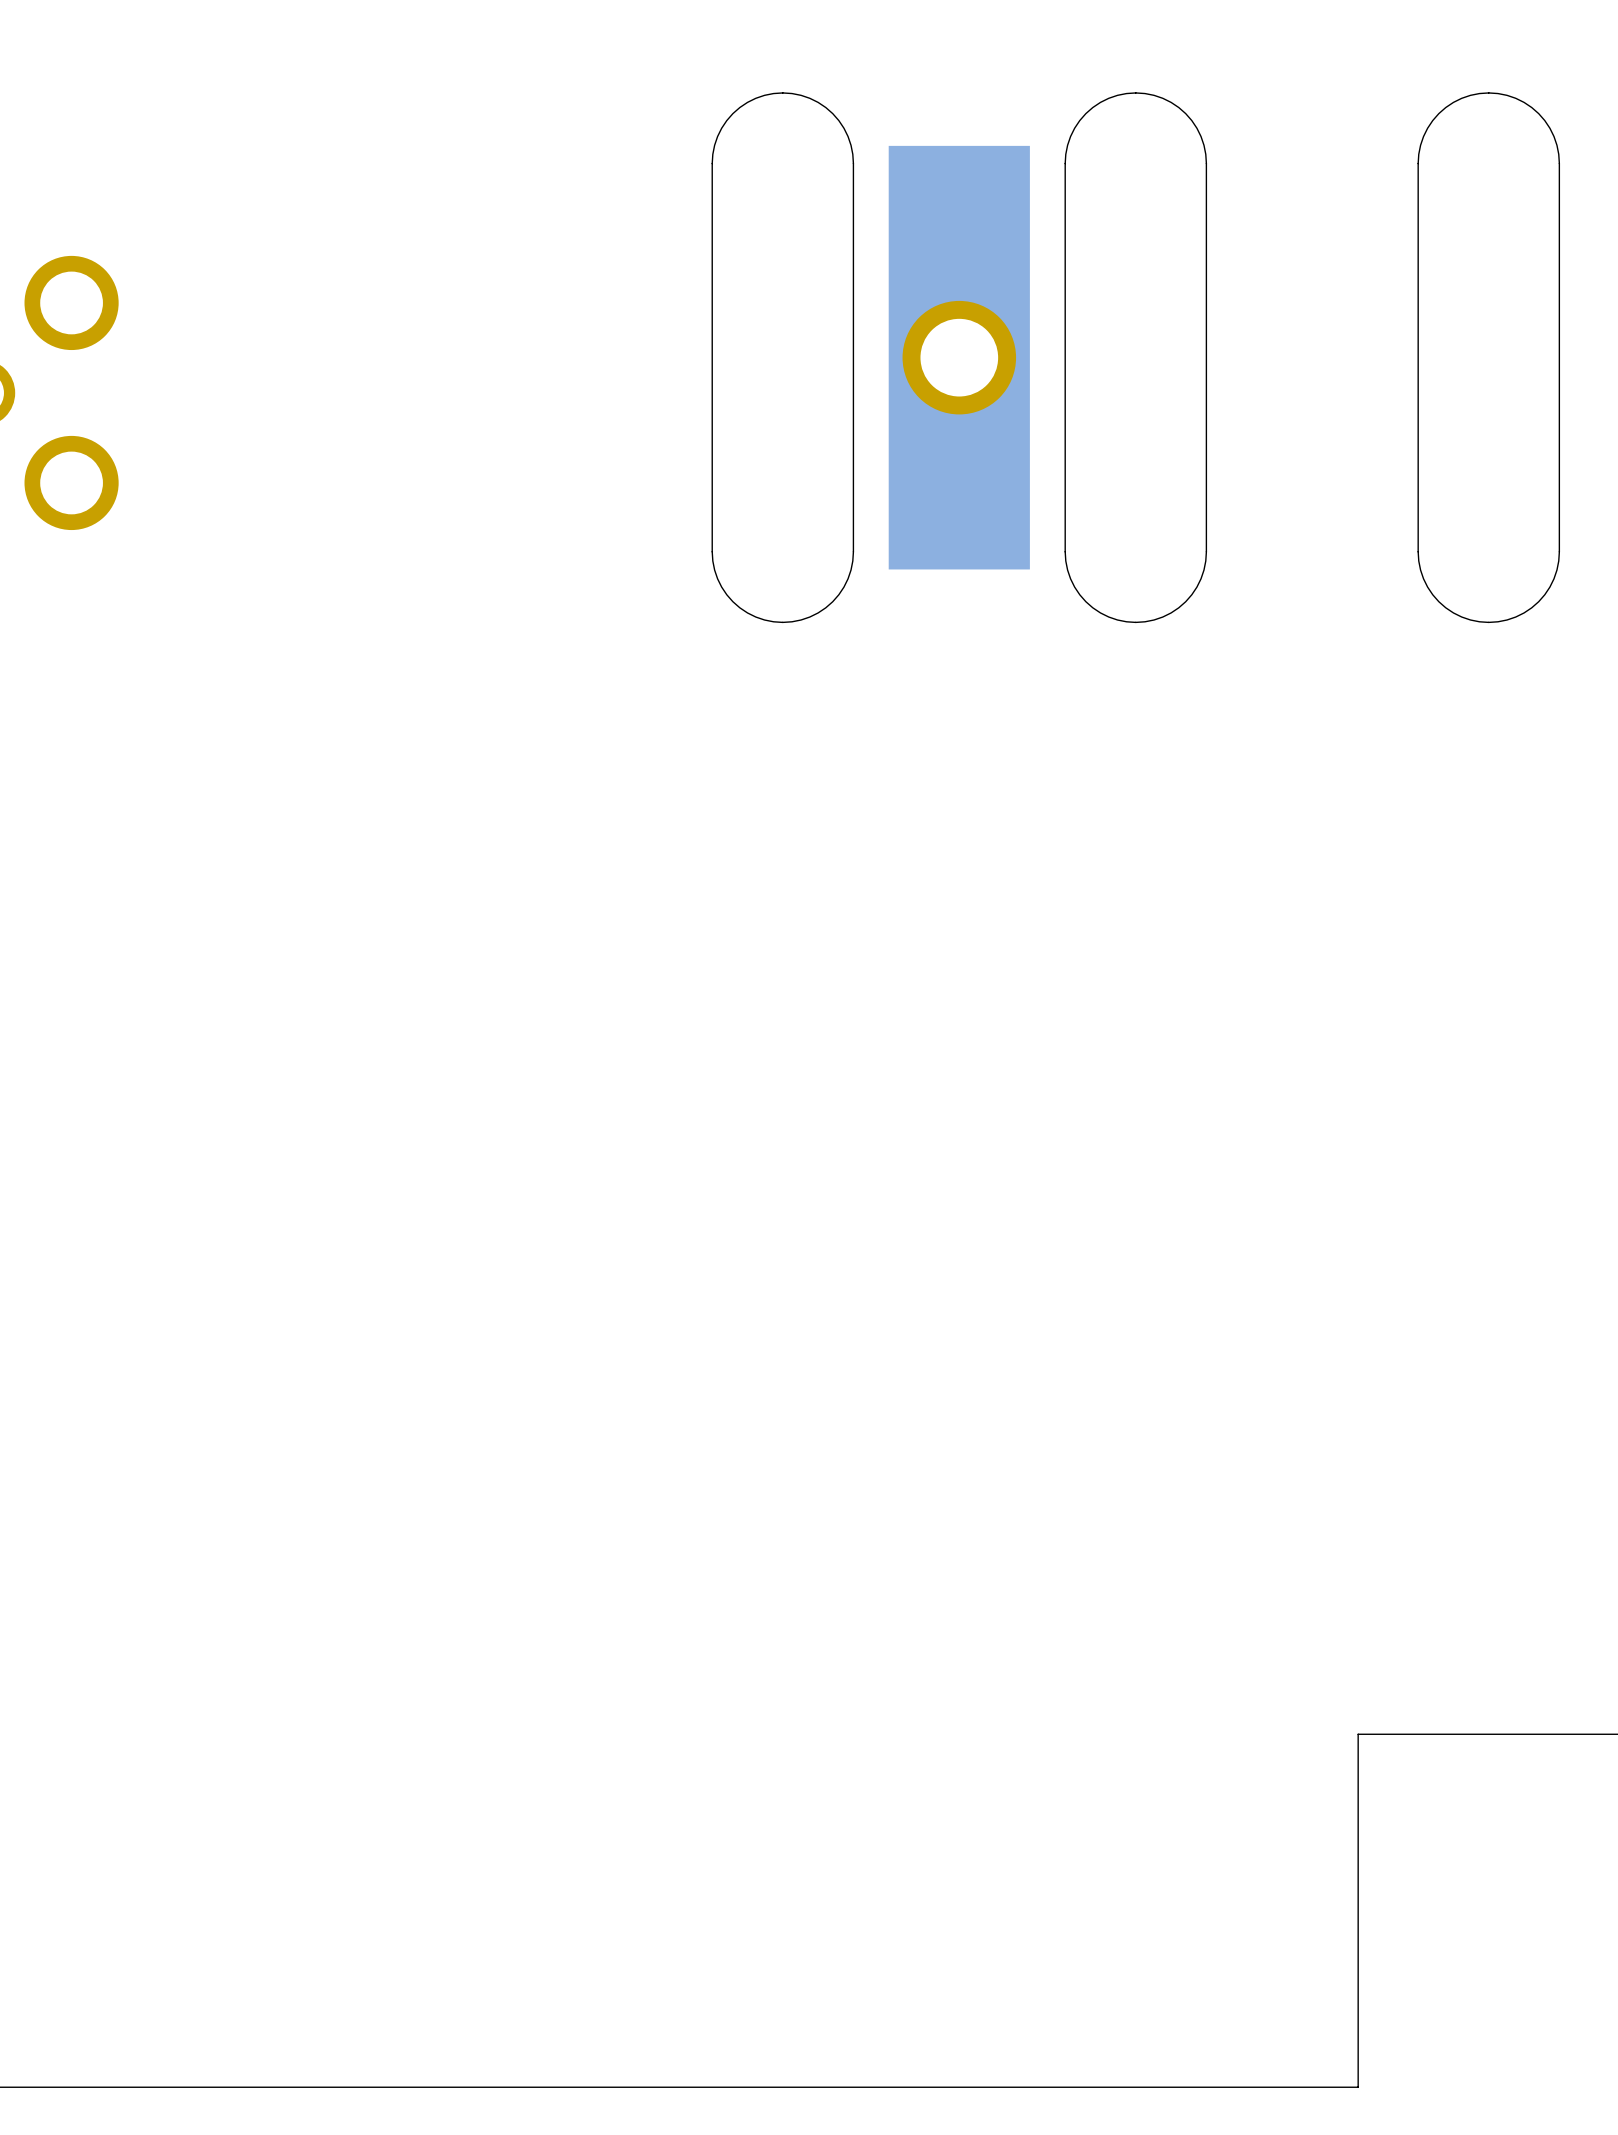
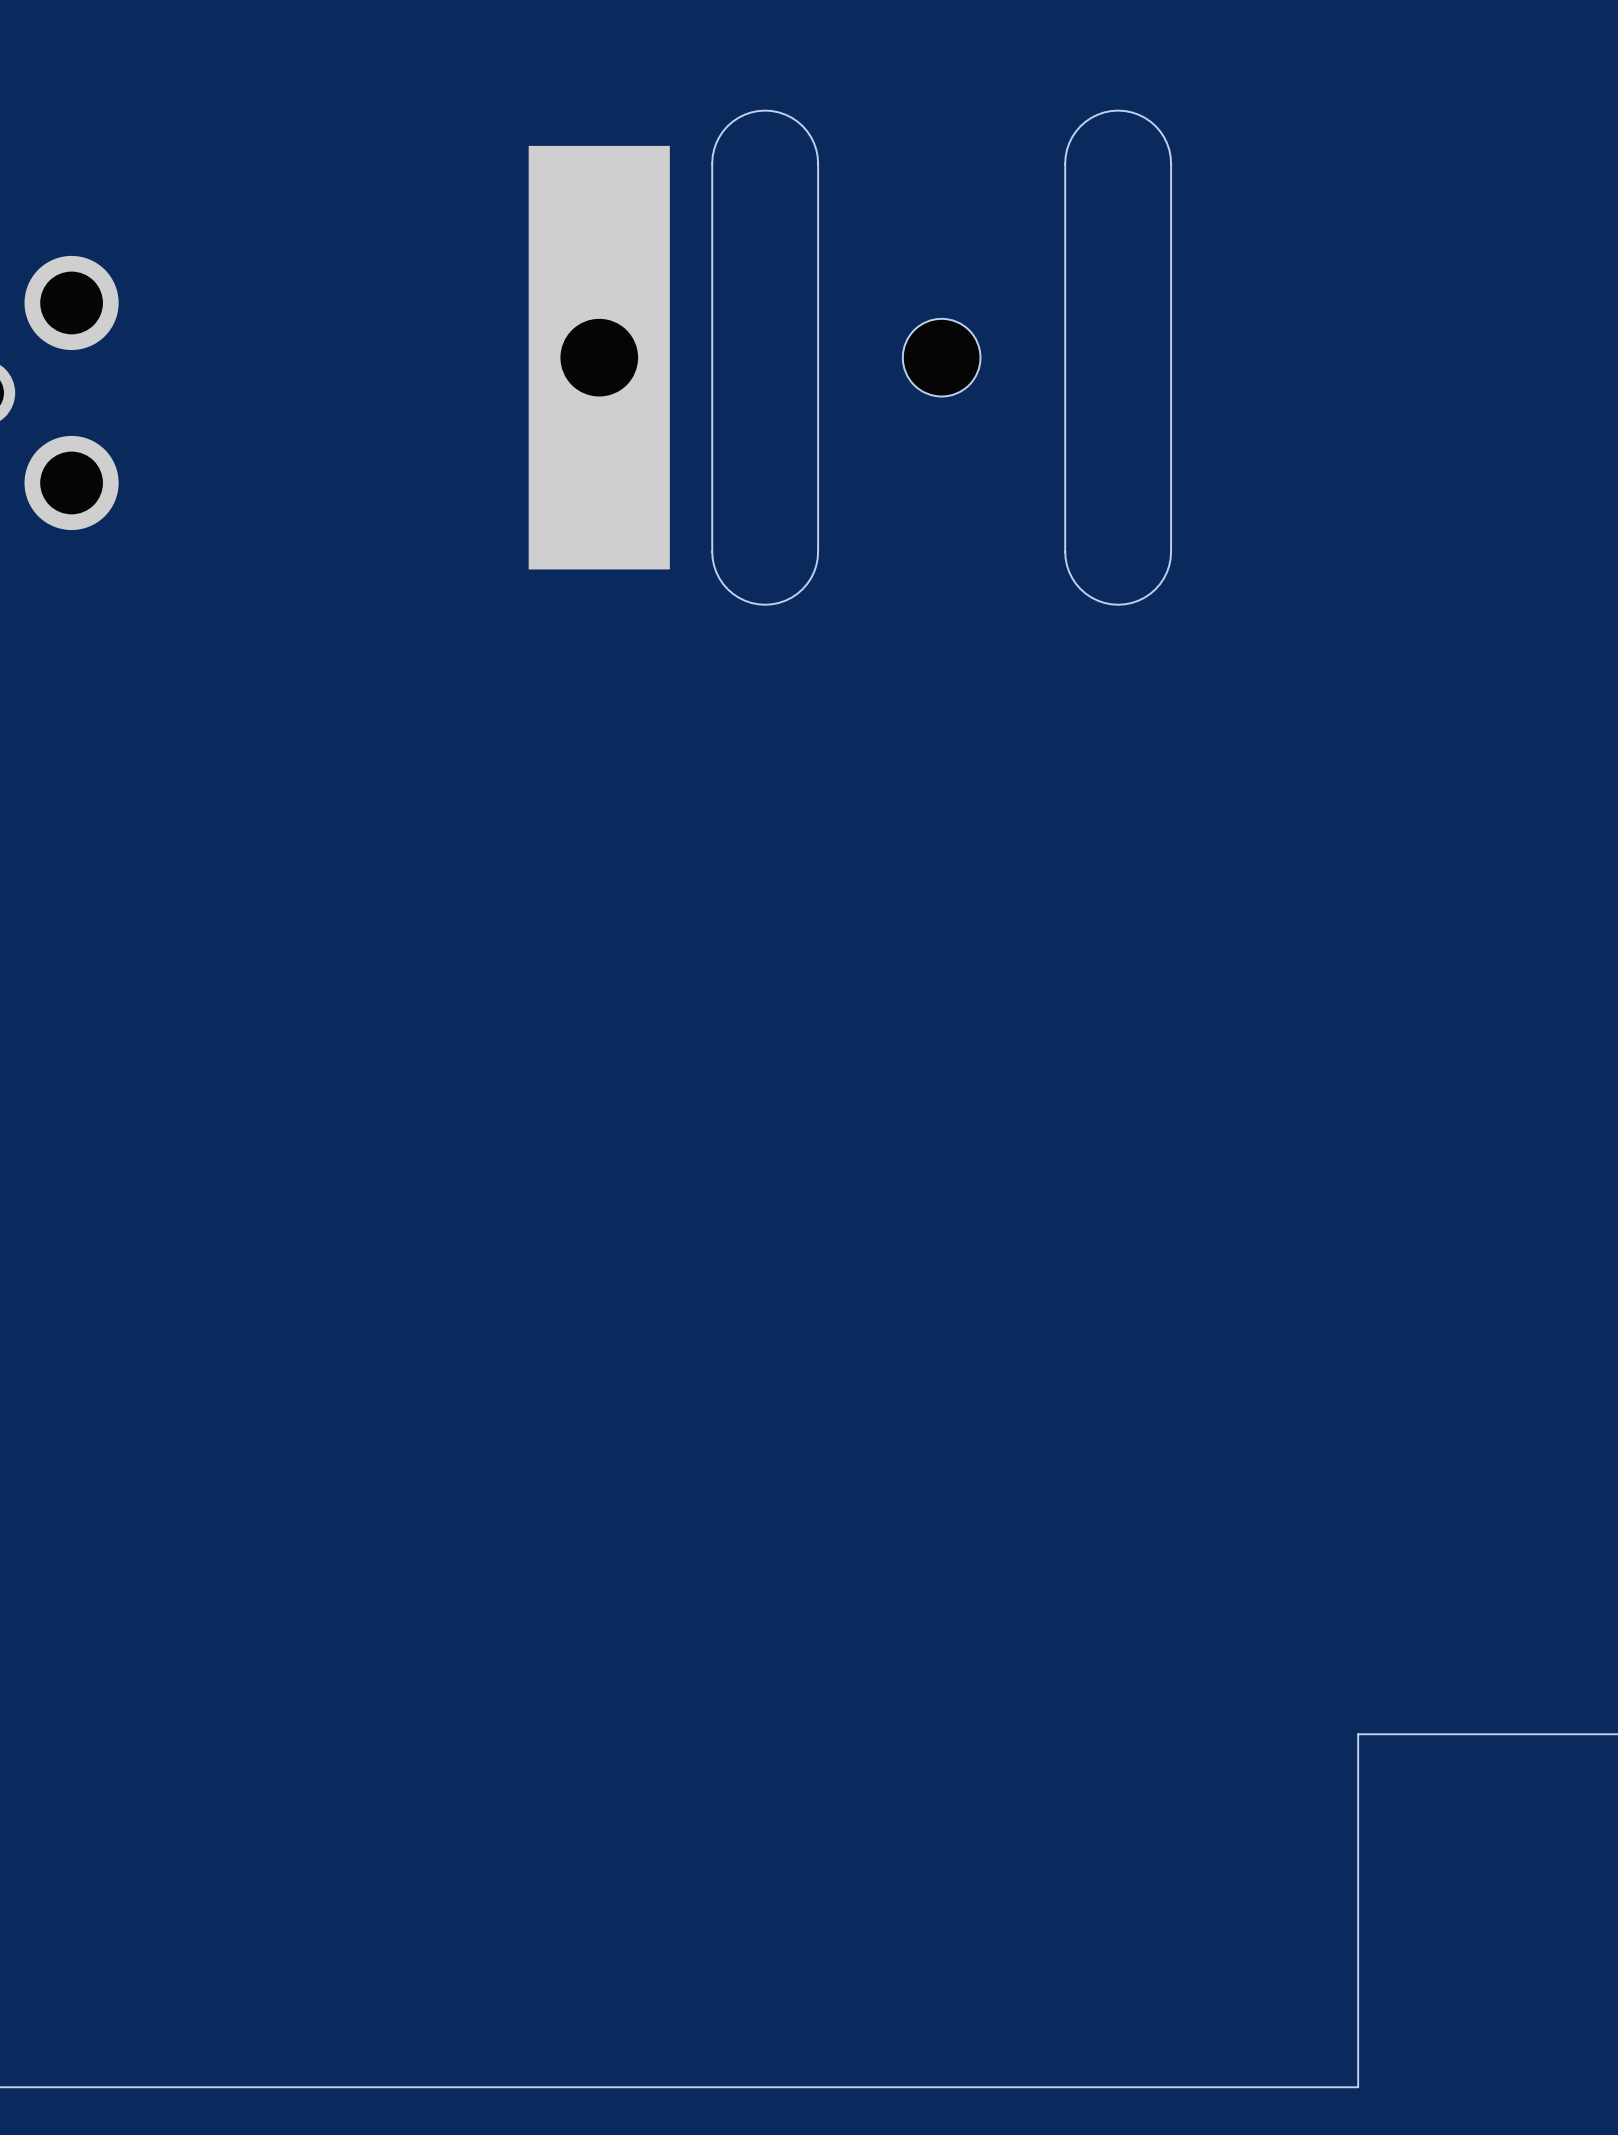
board edge: (1488, 92) (1515, 98) (1538, 113) (1553, 136) (1559, 163) (1558, 561) (1549, 587) (1531, 607) (1515, 617) (1488, 622) (1461, 617) (1438, 601) (1423, 578) (1418, 551) (1418, 154) (1427, 128) (1445, 107) (1461, 98) (1488, 92) -> none
board edge: (712, 163) (717, 136) (732, 113) (755, 98) (782, 92) (809, 98) (832, 113) (848, 136) (853, 163) (853, 551) (848, 578) (832, 601) (809, 617) (792, 621) (764, 620) (747, 612) (726, 594) (717, 578) (712, 551) -> (712, 163) (716, 143) (727, 126) (744, 114) (765, 110) (785, 114) (802, 126) (814, 143) (818, 163) (818, 551) (816, 565) (807, 584) (791, 597) (772, 604) (758, 604) (744, 600) (727, 589) (716, 572) (712, 551)
board edge: (1065, 163) (1070, 136) (1085, 113) (1108, 98) (1135, 92) (1162, 98) (1185, 113) (1201, 136) (1206, 163) (1206, 551) (1201, 578) (1185, 601) (1162, 617) (1145, 621) (1117, 620) (1100, 612) (1079, 594) (1070, 578) (1065, 551) -> (1065, 163) (1069, 143) (1080, 126) (1097, 114) (1118, 110) (1138, 114) (1155, 126) (1167, 143) (1171, 163) (1171, 551) (1169, 565) (1160, 584) (1144, 597) (1125, 604) (1111, 604) (1097, 600) (1080, 589) (1069, 572) (1065, 551)
hole: none -> (941, 357)
part position: (959, 357) -> (599, 357)

